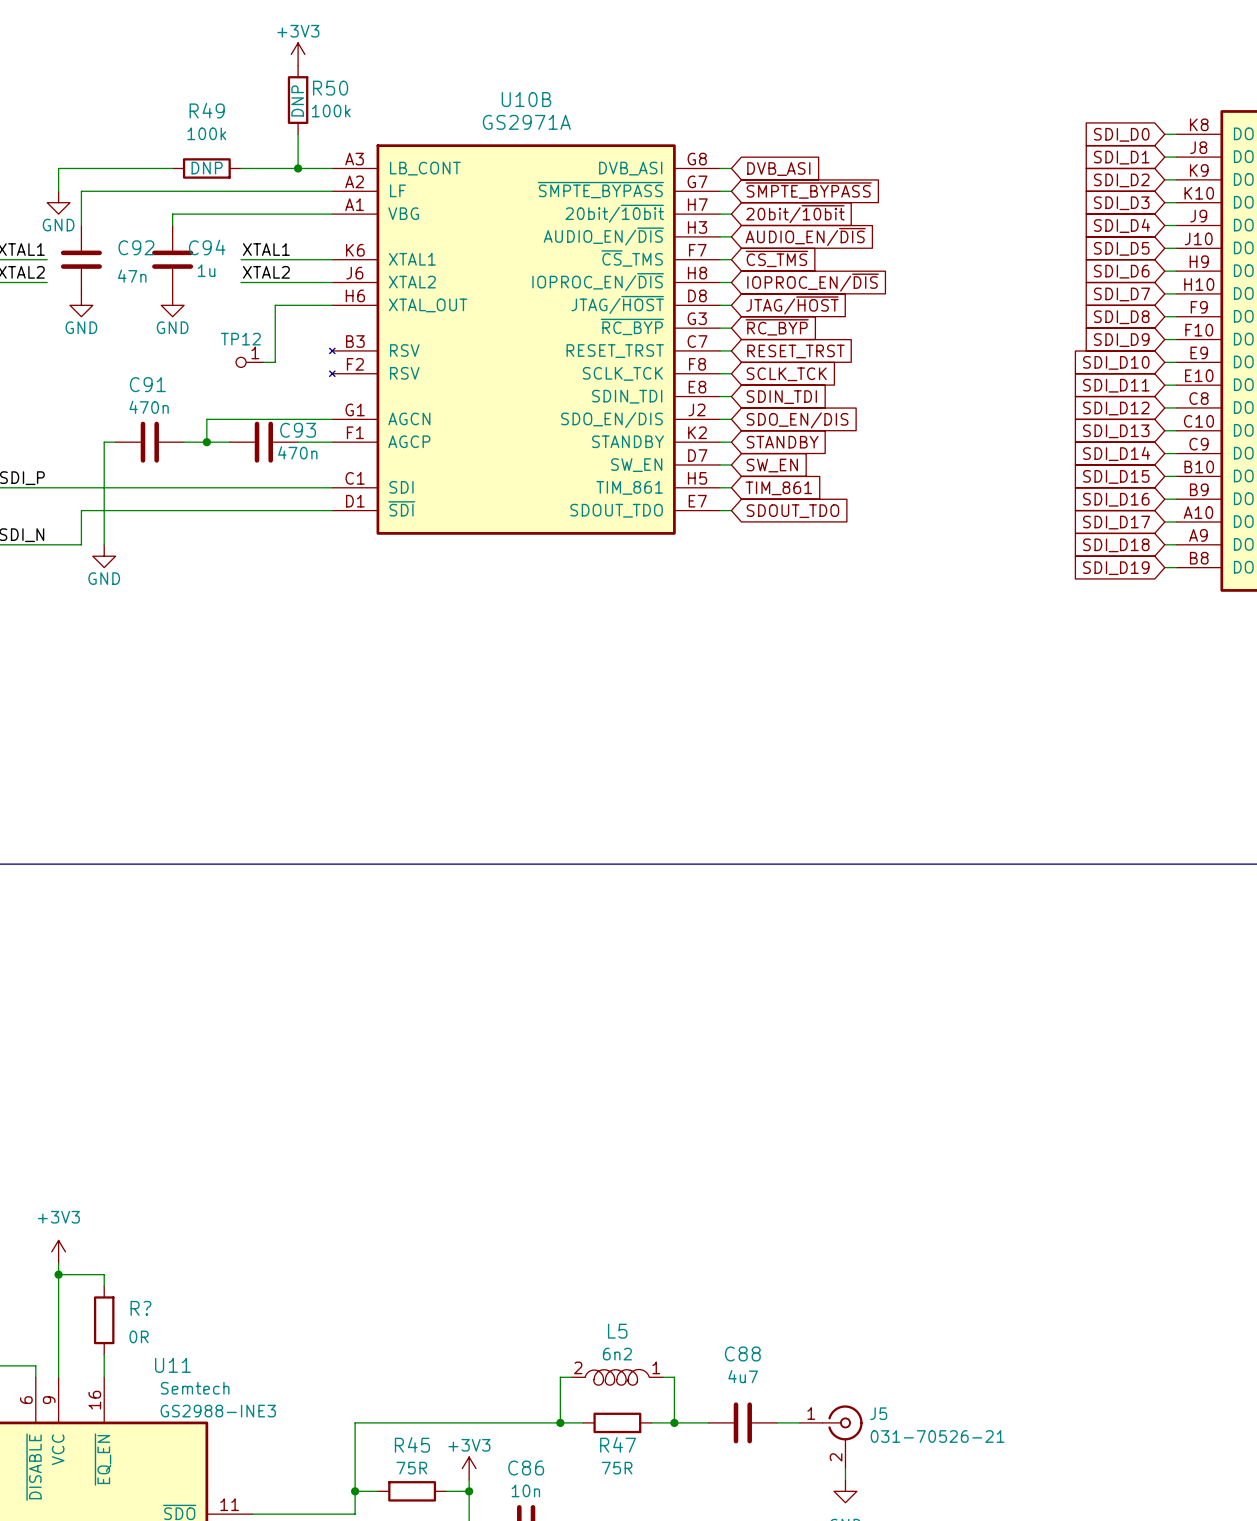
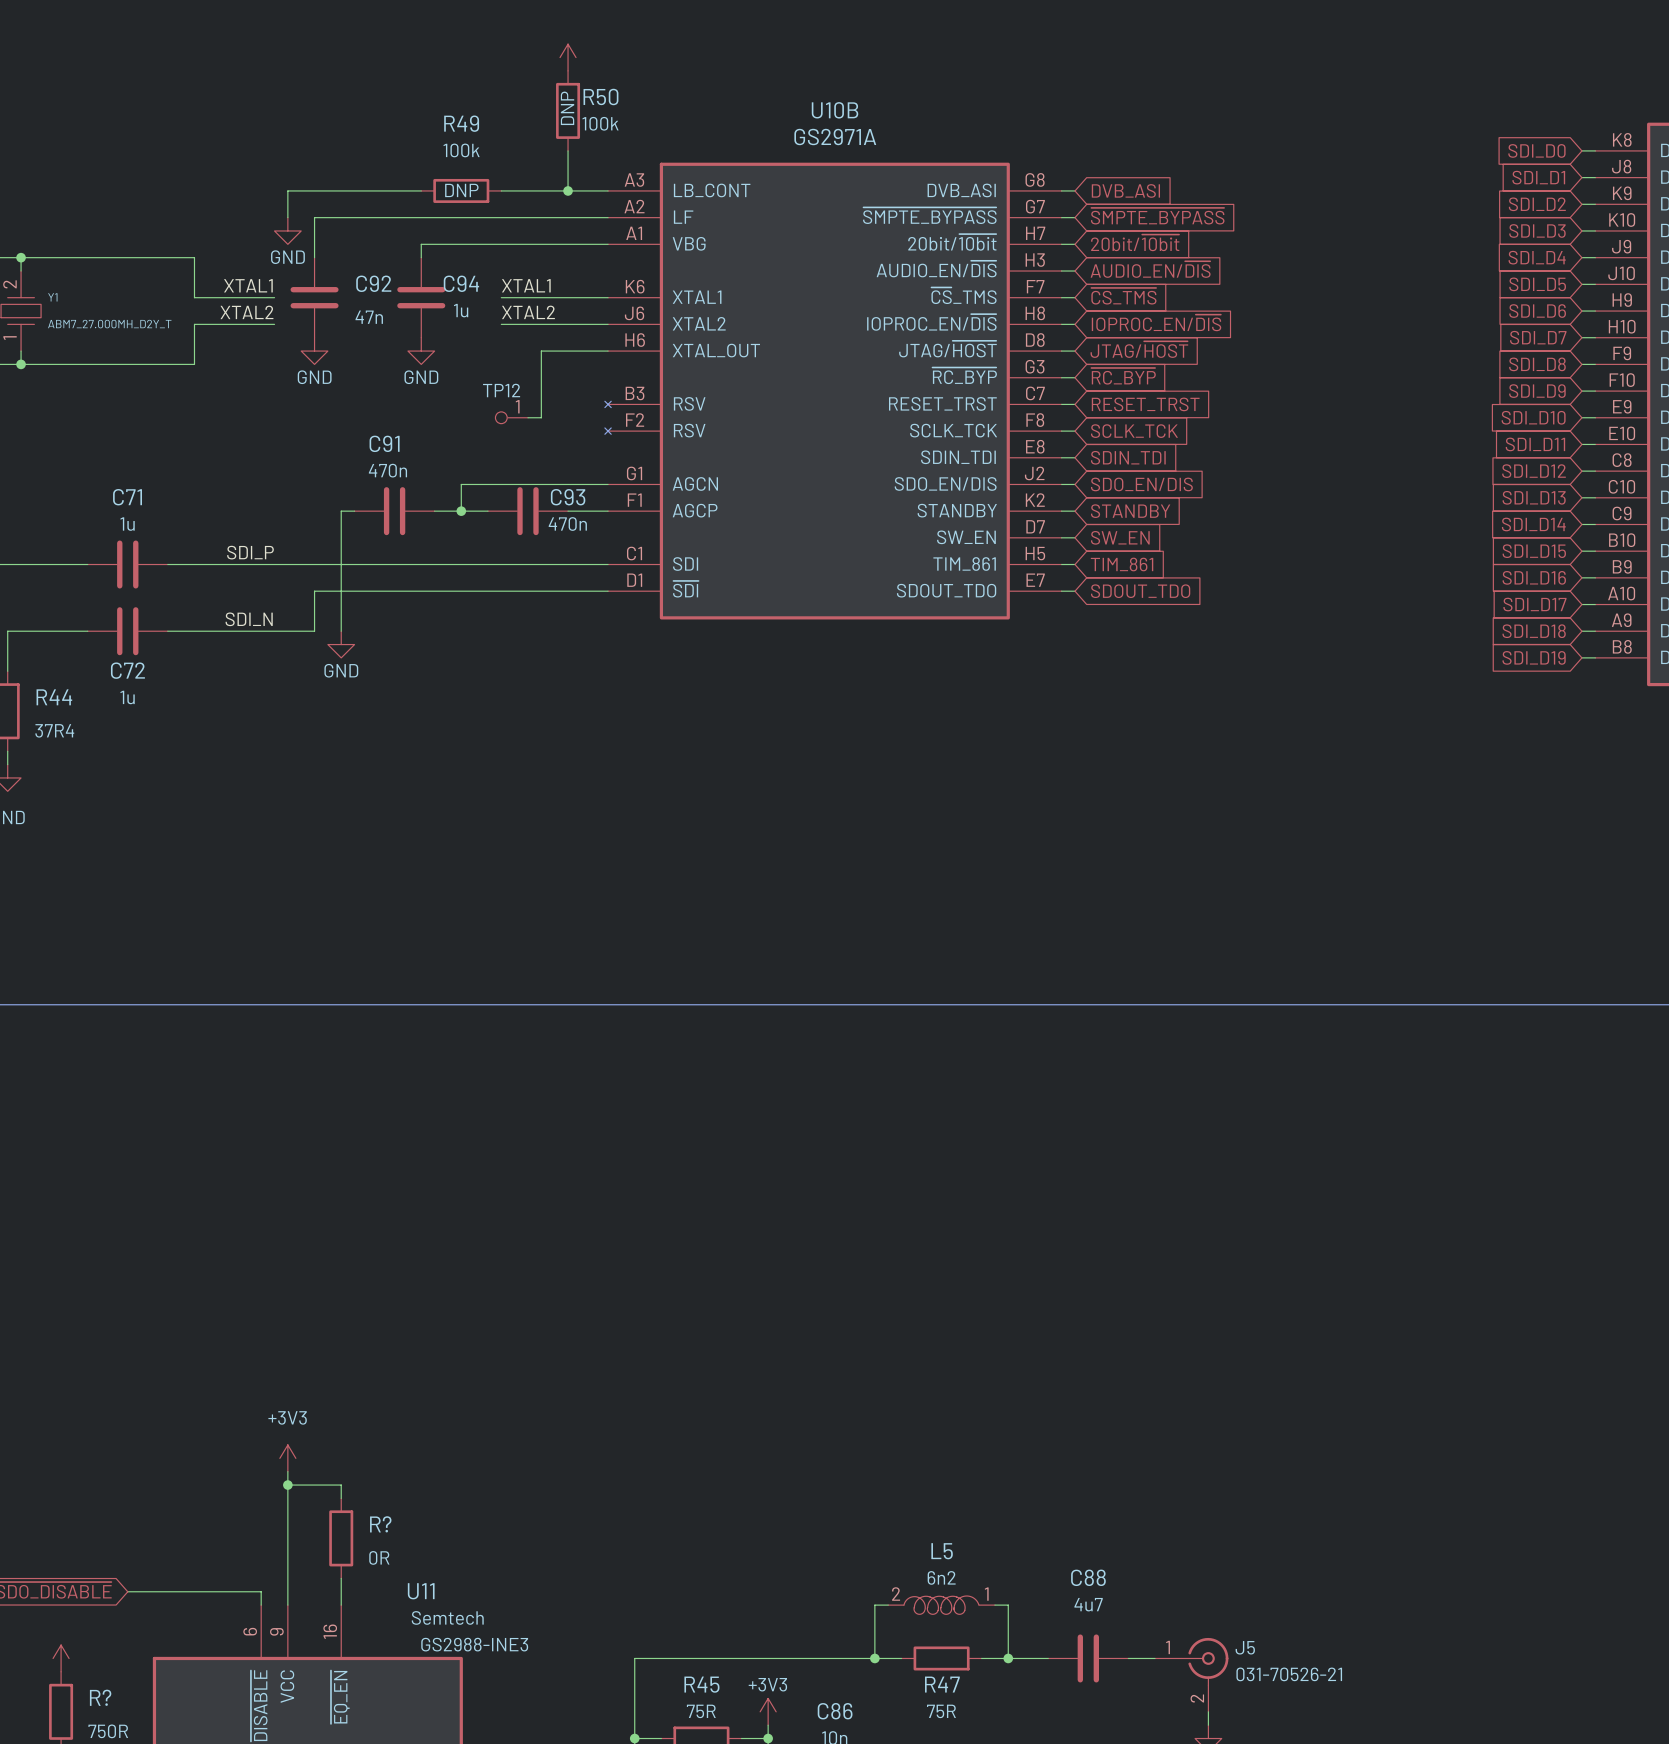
power symbol text: +3V3 (298, 31) -> none

